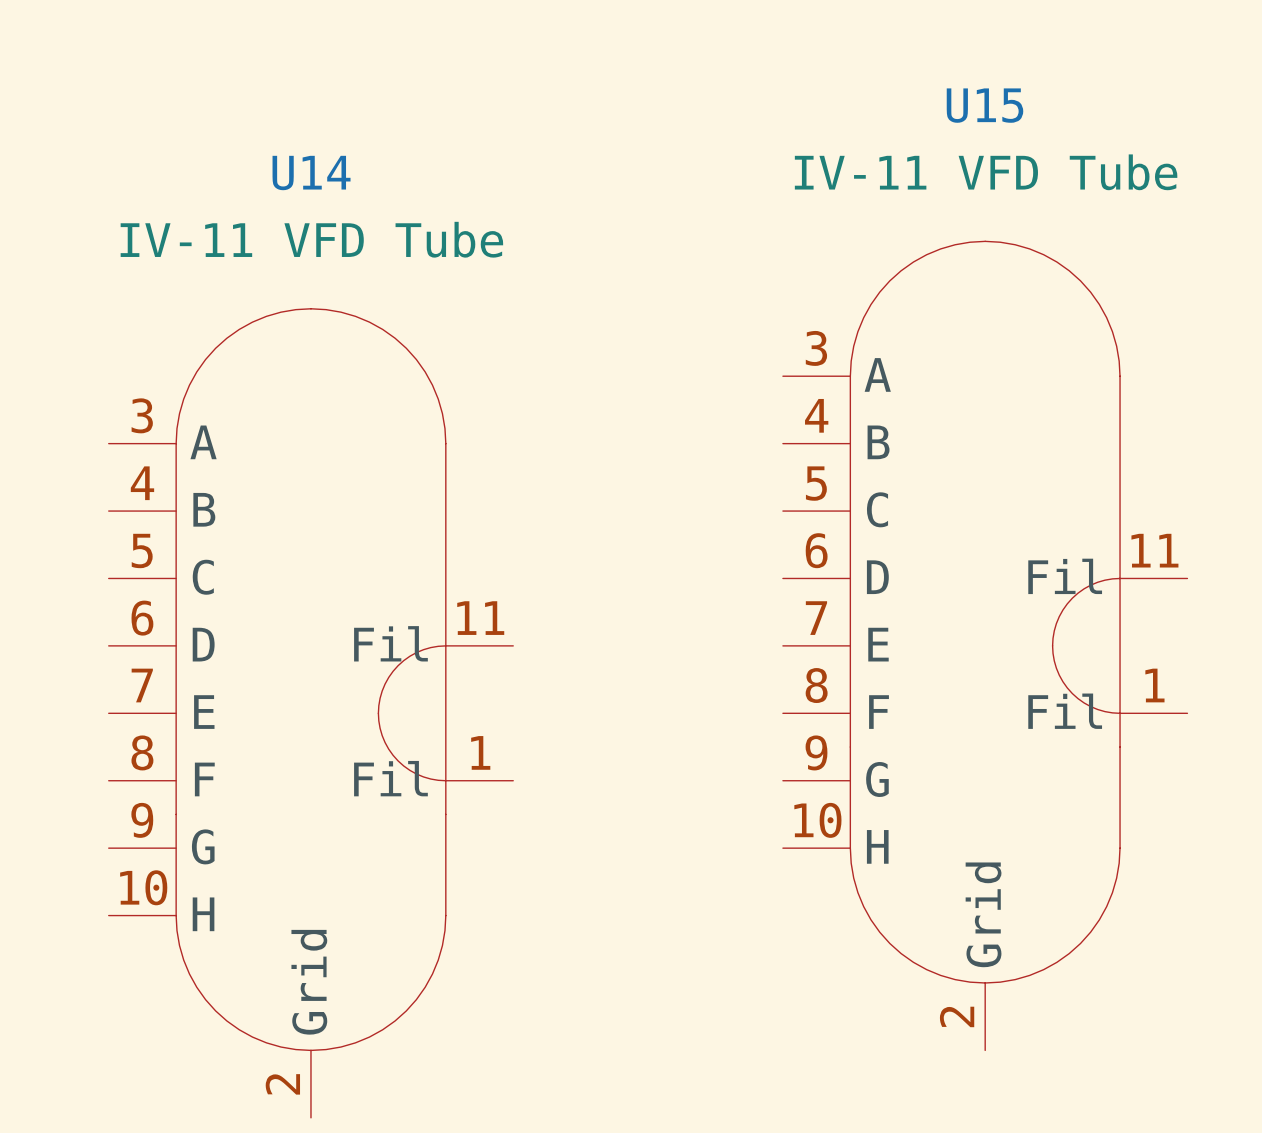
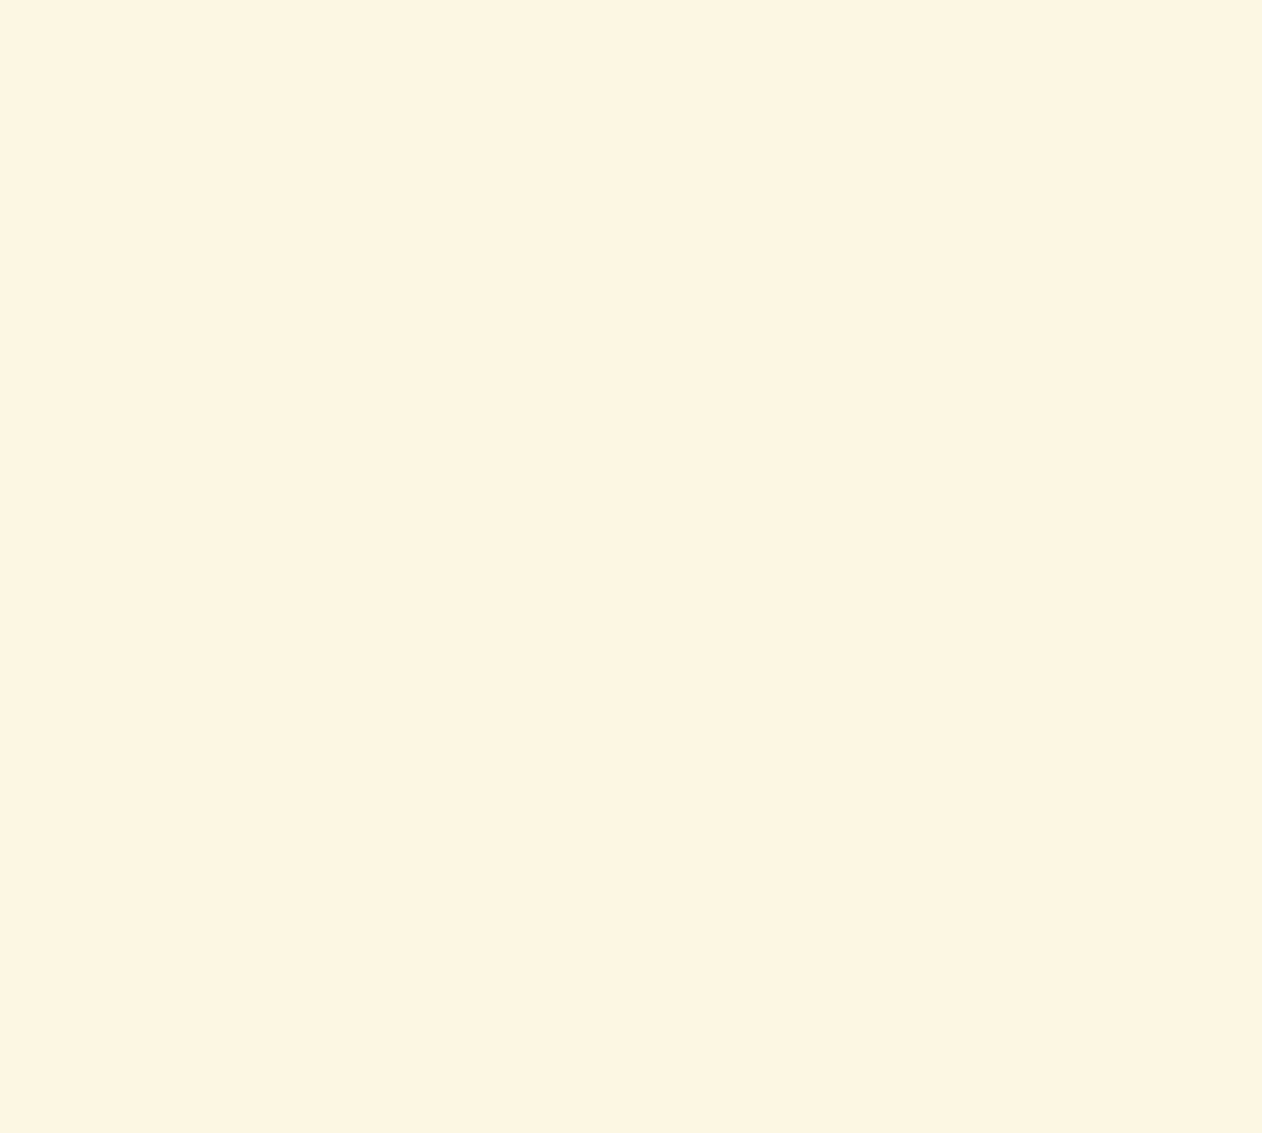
U15: IV-11 VFD Tube (985, 645) -> none
U14: IV-11 VFD Tube (310, 713) -> none

